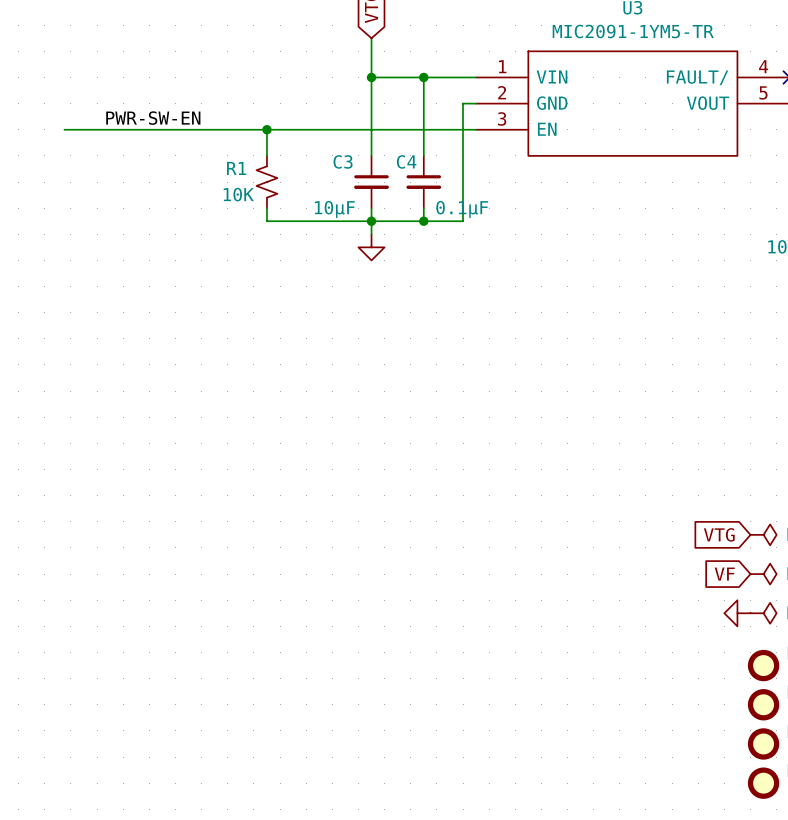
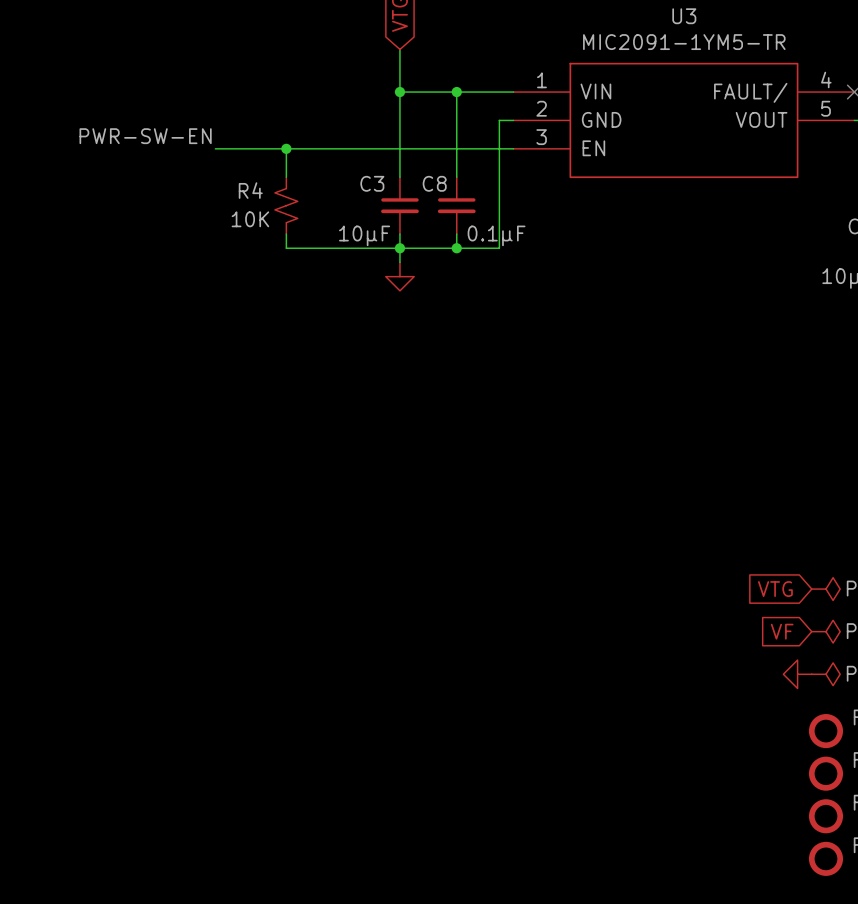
wire: (64, 129) (201, 129) -> none
C4 name: C4 (406, 161) -> C8 (434, 183)
R1 name: R1 (236, 168) -> R4 (250, 190)

